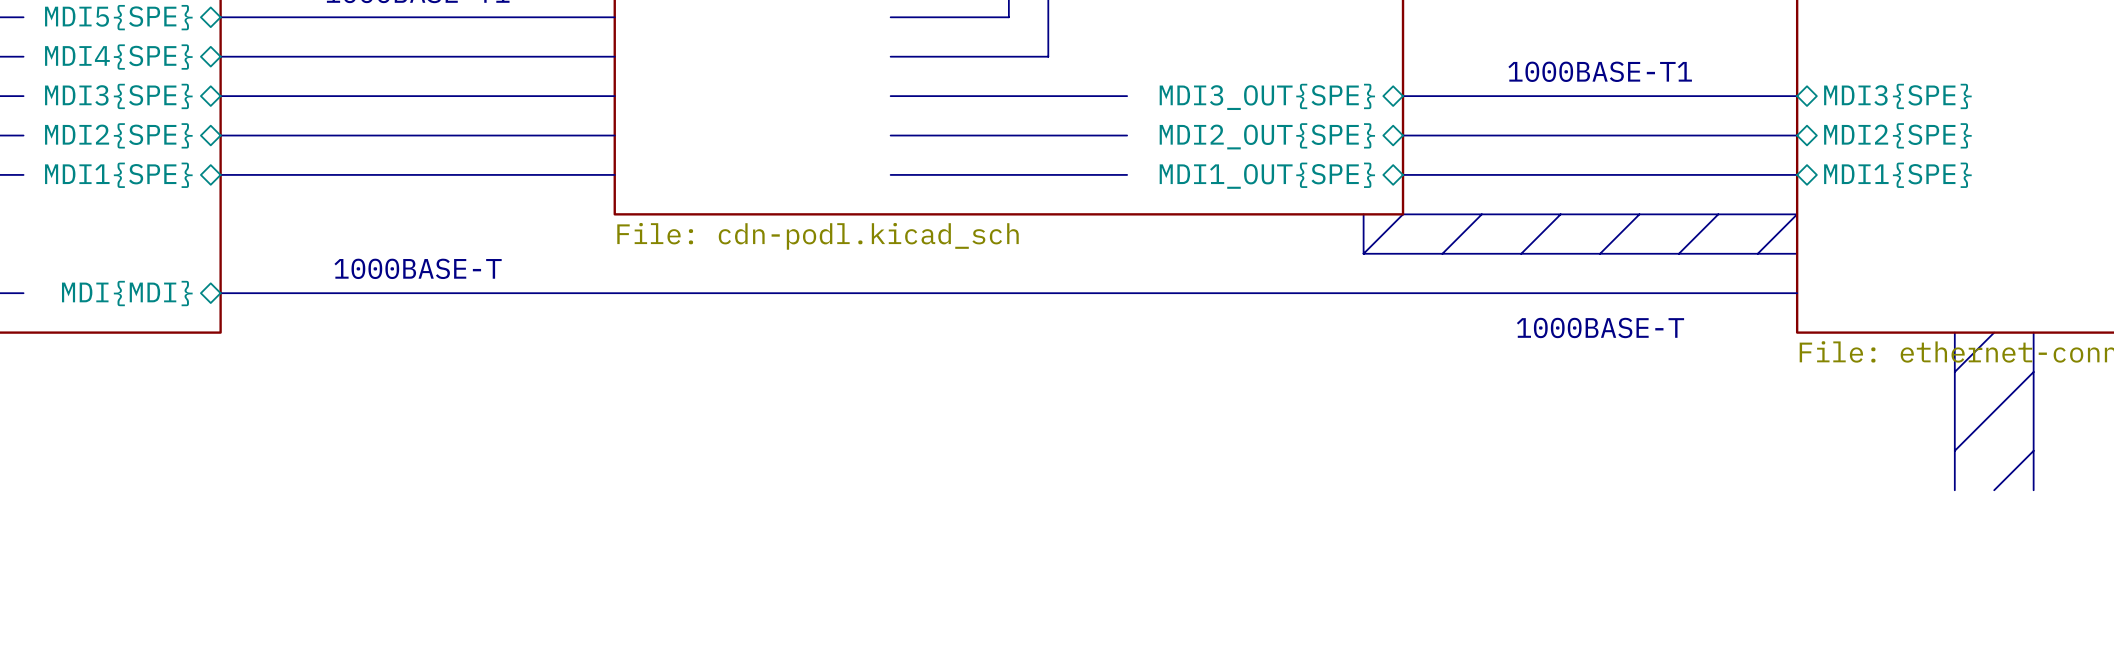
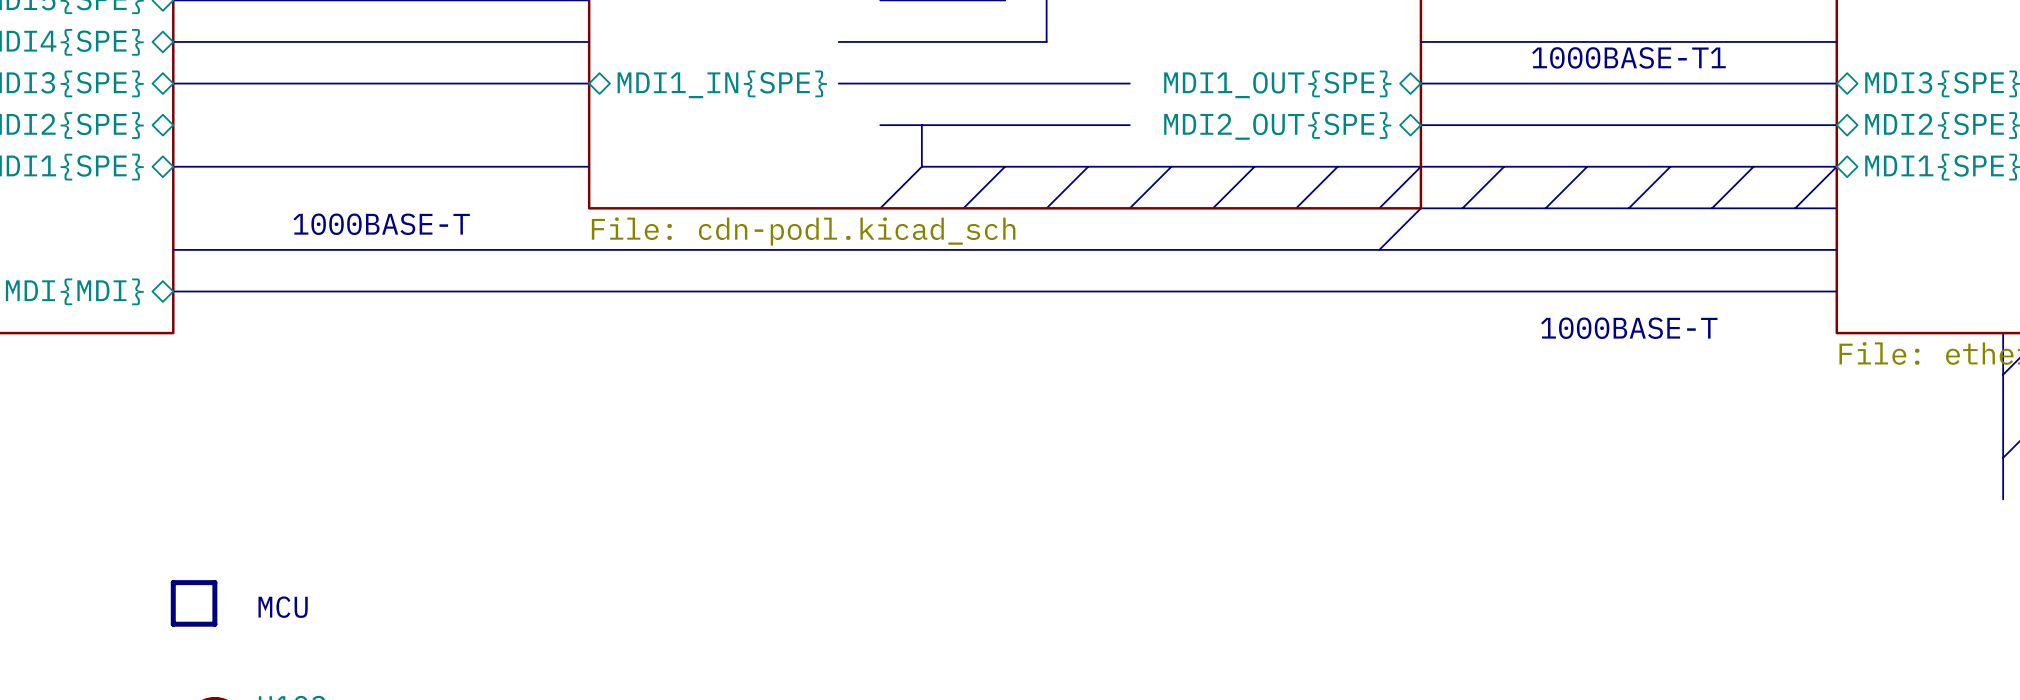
line: none -> (838, 41) (880, 41)
sheet pin: none -> MDI1_IN{SPE} (722, 84)
sheet pin: MDI3_OUT{SPE} (1267, 96) -> MDI1_OUT{SPE} (1277, 84)
bus: (220, 135) (614, 135) -> none
line: none -> (921, 125) (921, 166) (880, 208)
line: (890, 174) (930, 174) -> (838, 83) (880, 83)
line: none -> (1005, 166) (963, 208)
line: none -> (1088, 166) (1046, 208)
line: none -> (1129, 166) (1836, 166) (1795, 208)
line: none -> (1171, 166) (1129, 208)
line: none -> (1254, 166) (1212, 208)
line: none -> (1337, 166) (1296, 208)
bus: (1403, 174) (1797, 174) -> (1420, 41) (1836, 41)
sheet pin: MDI1_OUT{SPE} (1267, 175) -> none
line: (1363, 214) (1363, 253) (1797, 253) -> (1379, 208) (1420, 166)
line: (1481, 214) (1442, 253) -> (1504, 166) (1462, 208)
line: (1560, 214) (1521, 253) -> (1587, 166) (1545, 208)
line: (1639, 214) (1600, 253) -> (1670, 166) (1628, 208)
line: (1718, 214) (1678, 253) -> (1753, 166) (1712, 208)
line: (1797, 214) (1757, 253) -> none
bus: none -> (173, 249) (1836, 249)
text position: 1000BASE-T (418, 268) -> 1000BASE-T (381, 224)
line: none -> (173, 582) (214, 582) (214, 624) (173, 624) (173, 582)
text: none -> MCU (283, 607)

